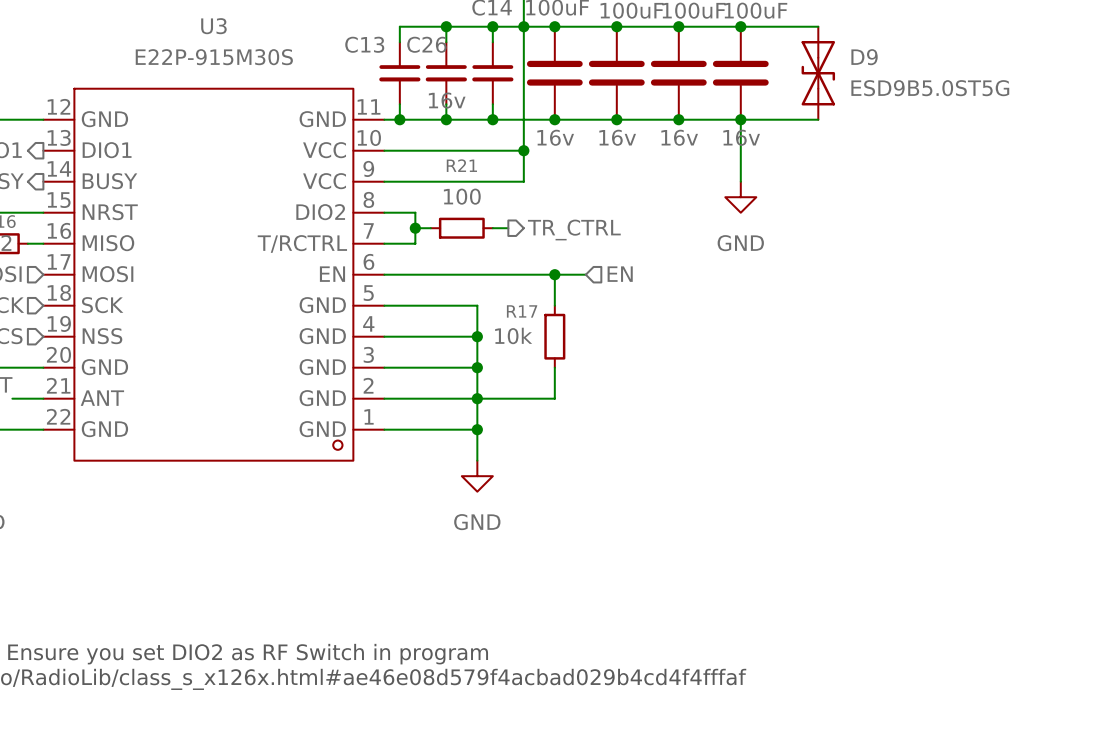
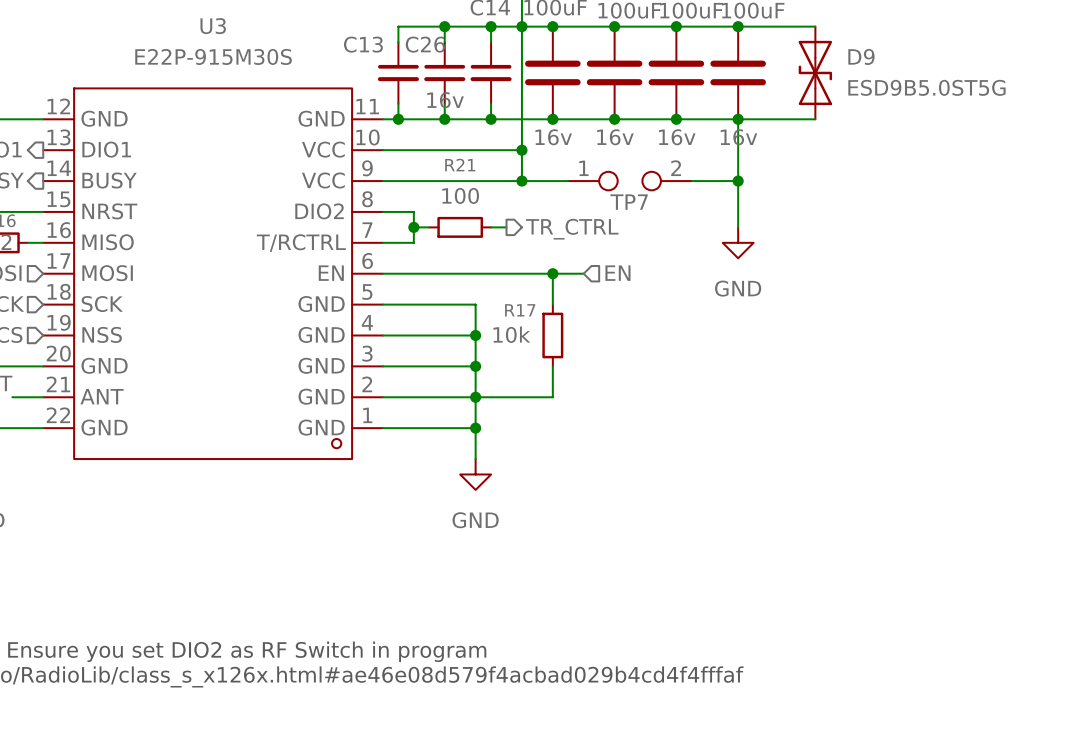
wire: none -> (521, 181) (568, 181)
junction: none -> (521, 181)
TP7: none -> (630, 181)
wire: none -> (691, 181) (738, 181) (738, 227)
junction: none -> (738, 181)
power symbol position: GND (740, 197) -> GND (738, 242)

